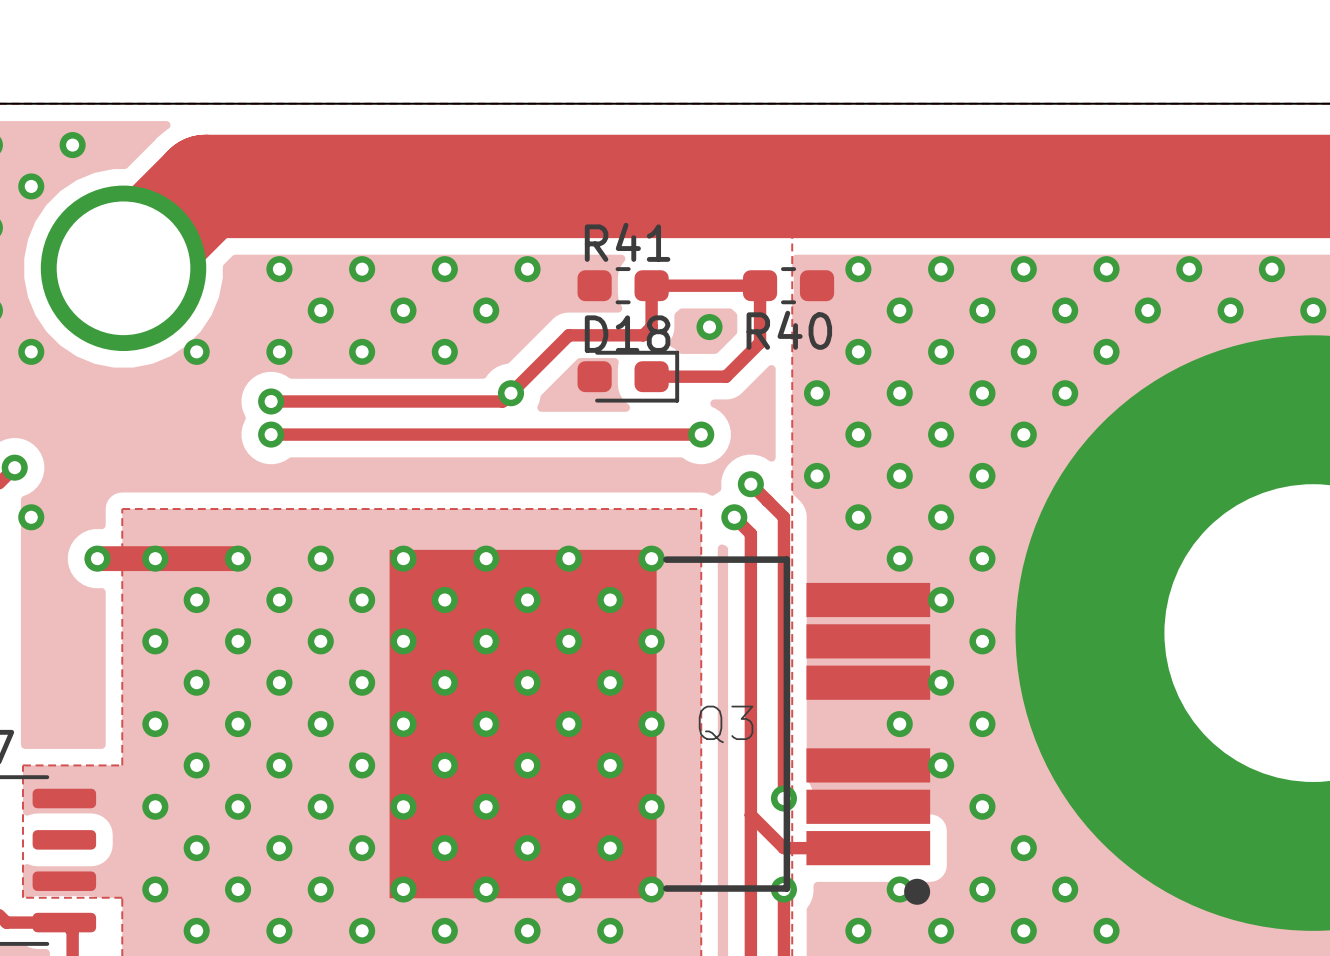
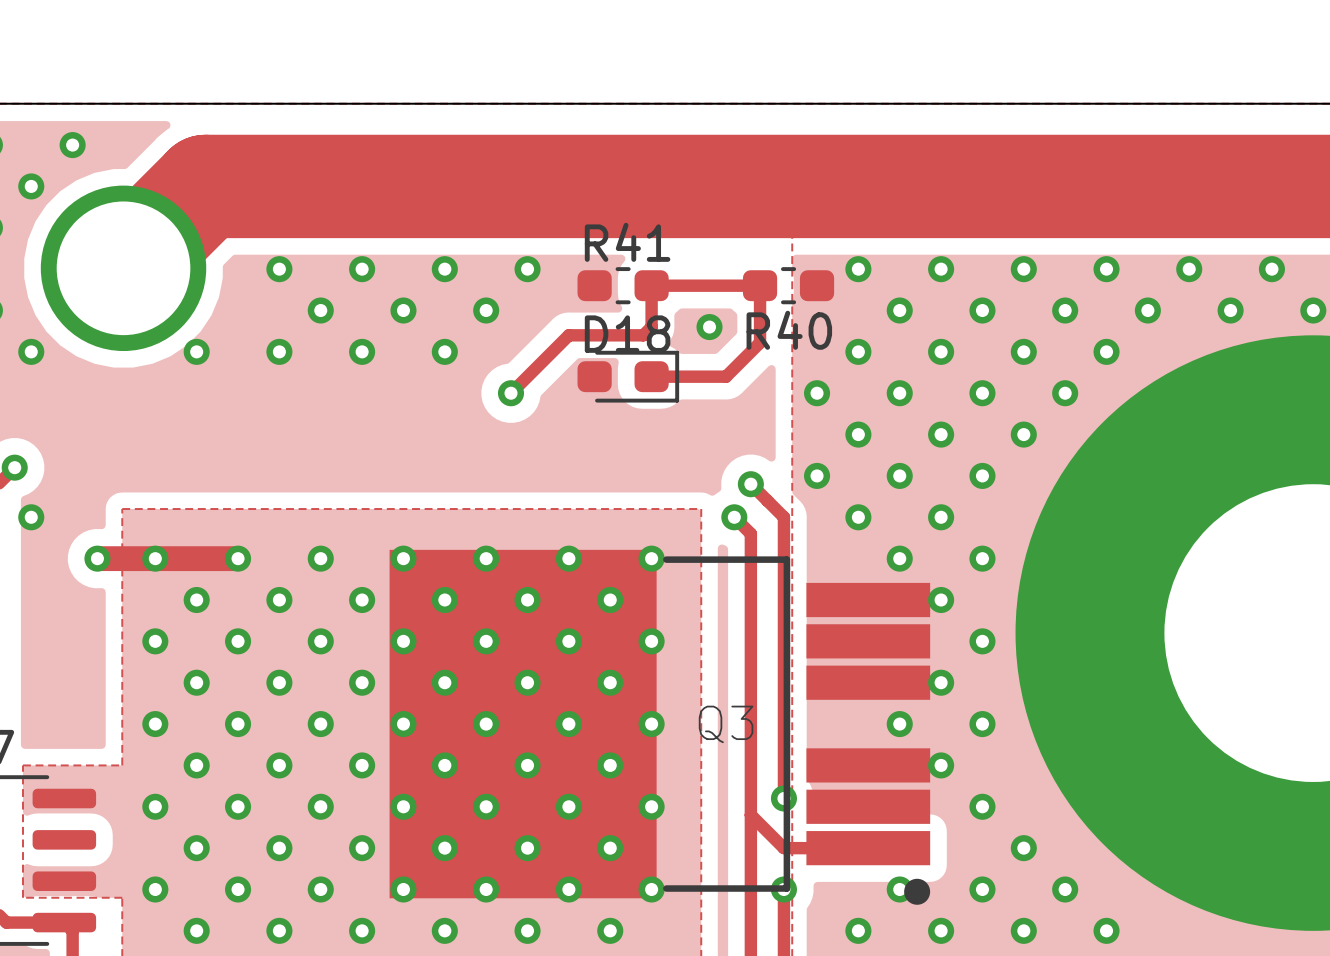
track: (511, 393) (502, 401) (271, 401) -> none
via: (271, 401) -> none
track: (271, 434) (701, 434) -> none
via: (271, 434) -> none
via: (701, 434) -> none

